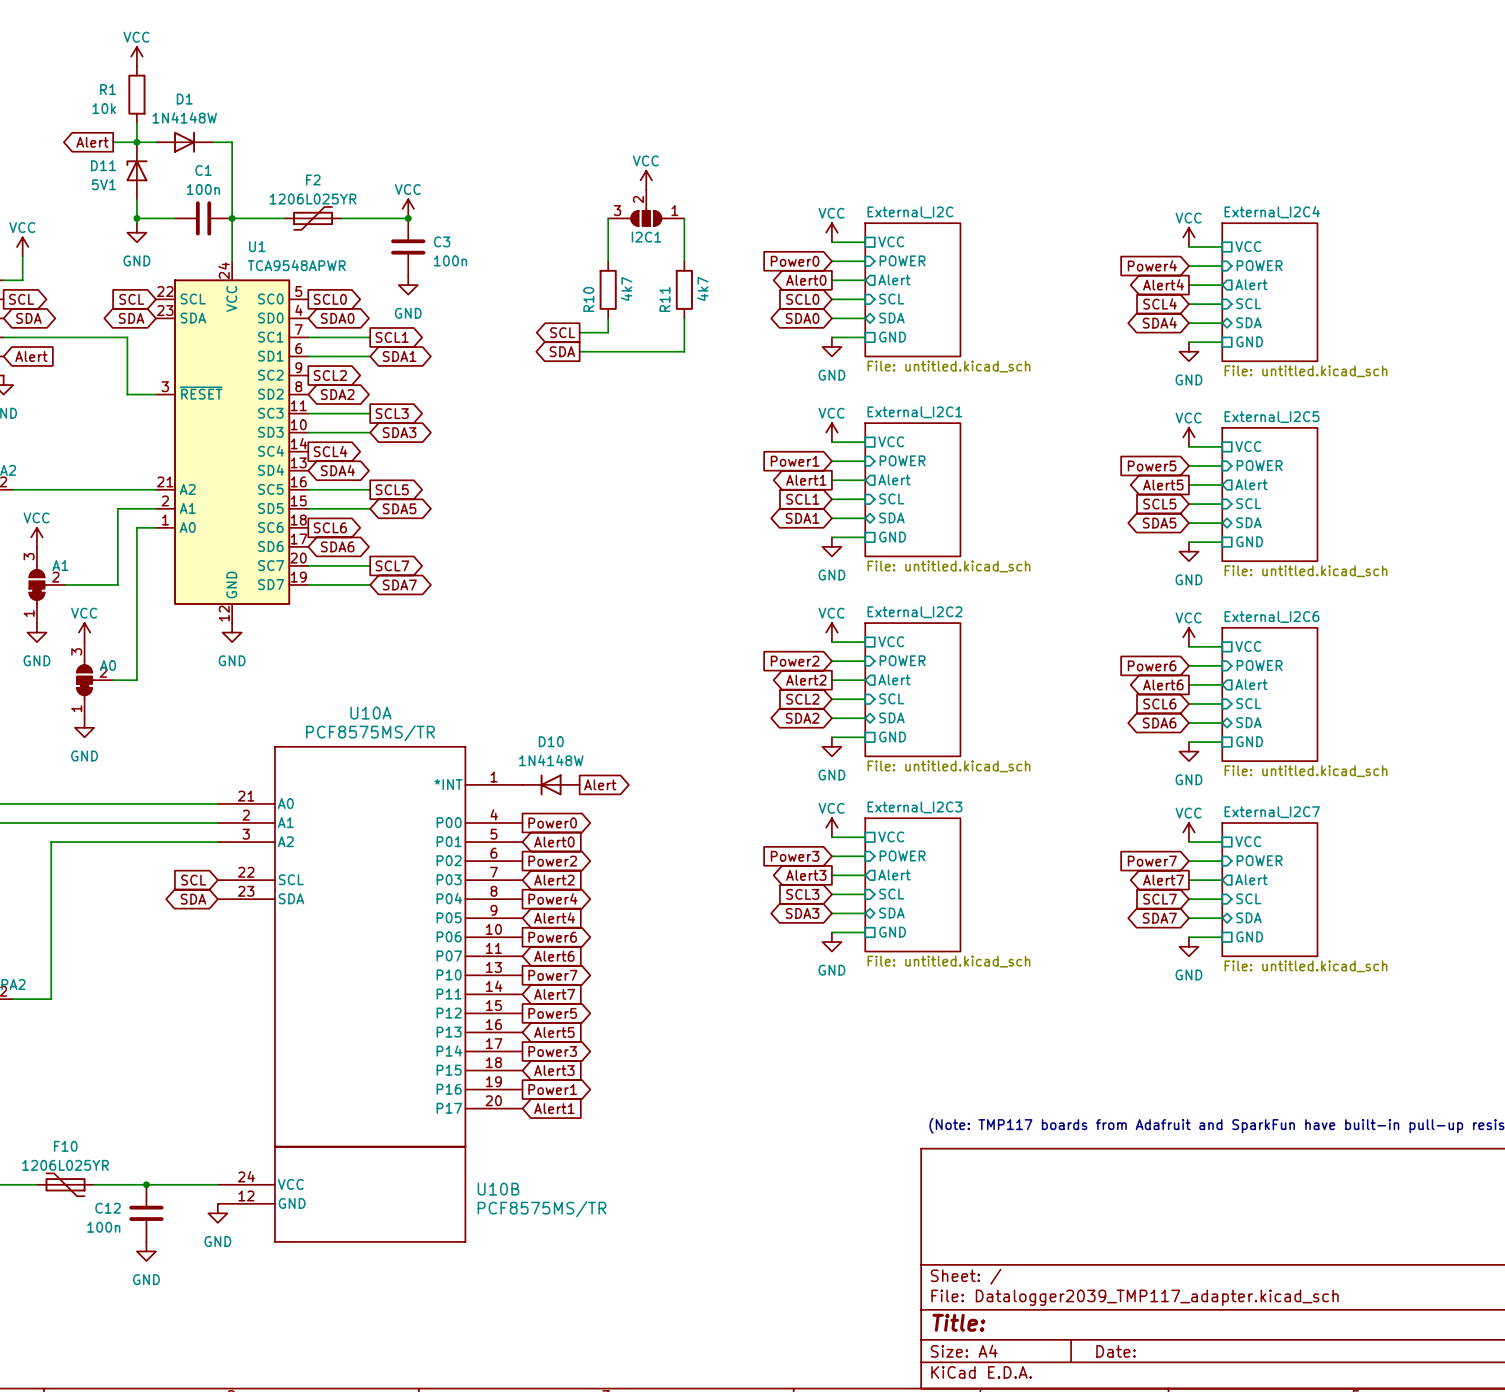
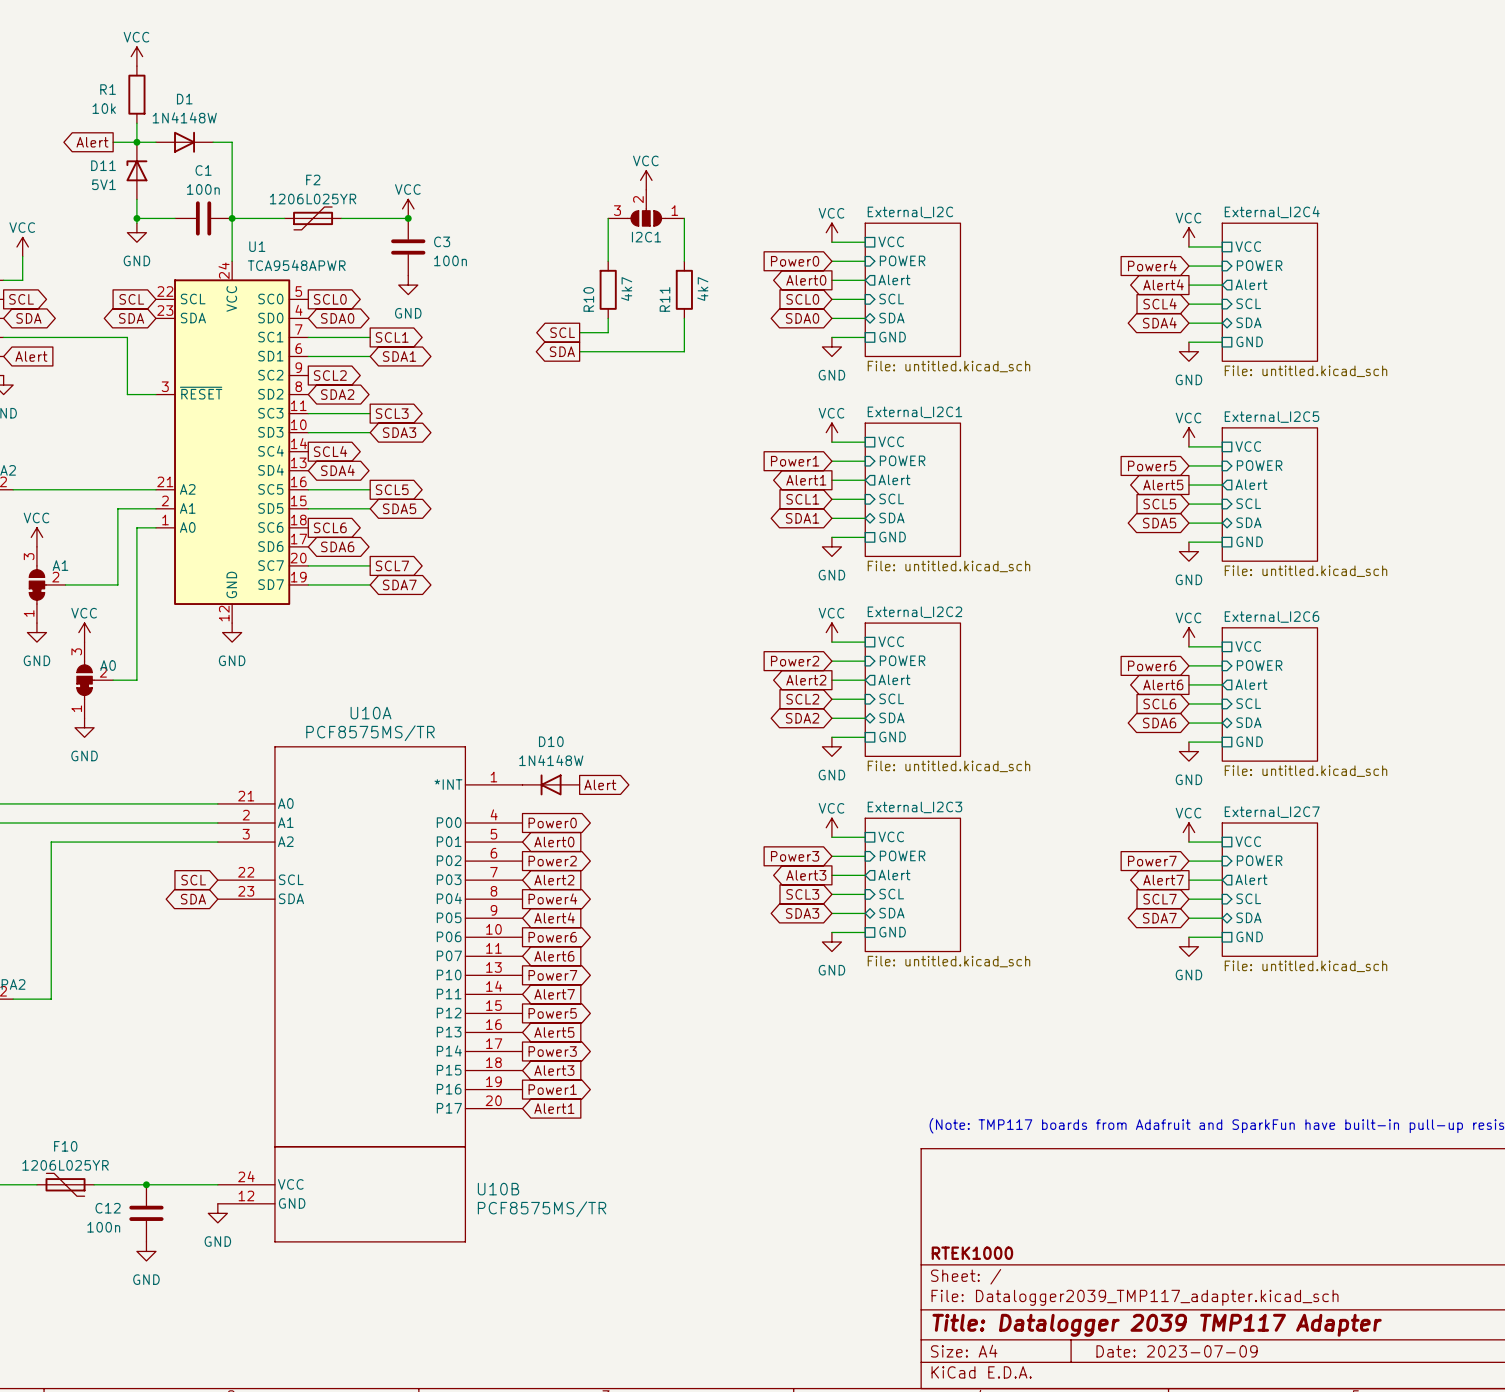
title block: none -> RTEK1000 (972, 1253)
title block: Title: (958, 1322) -> Title: Datalogger 2039 TMP117 Adapter (1157, 1325)
title block: Date: (1116, 1351) -> Date: 2023-07-09 (1177, 1351)

